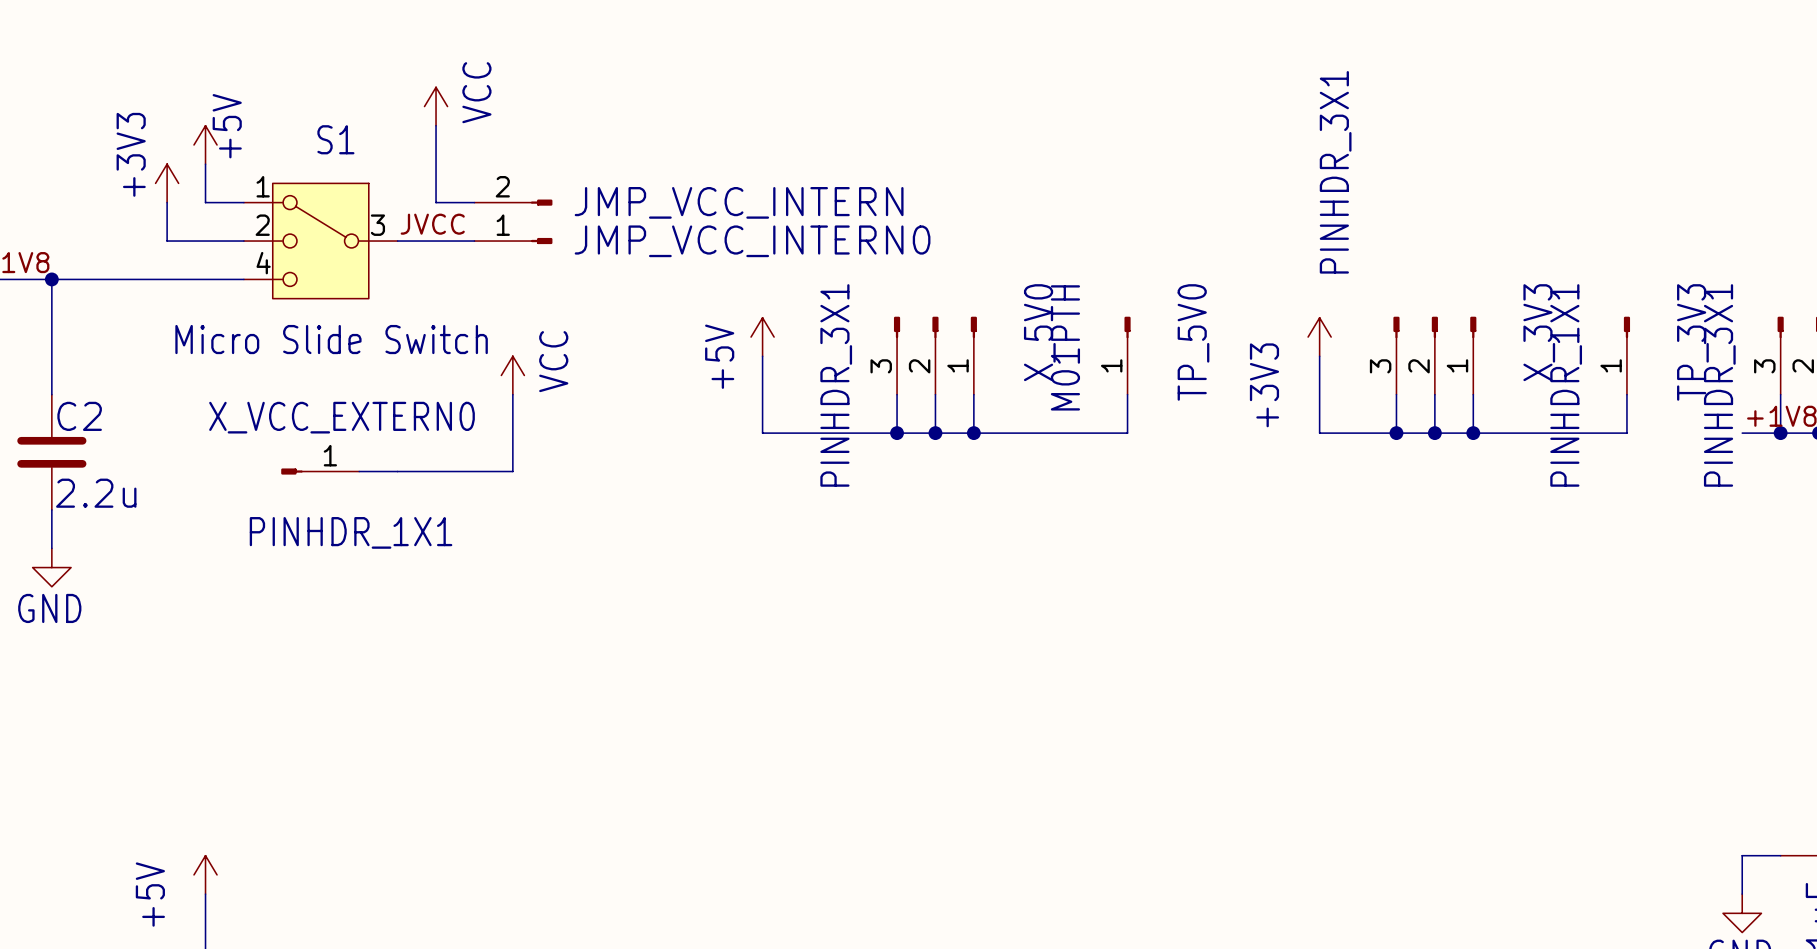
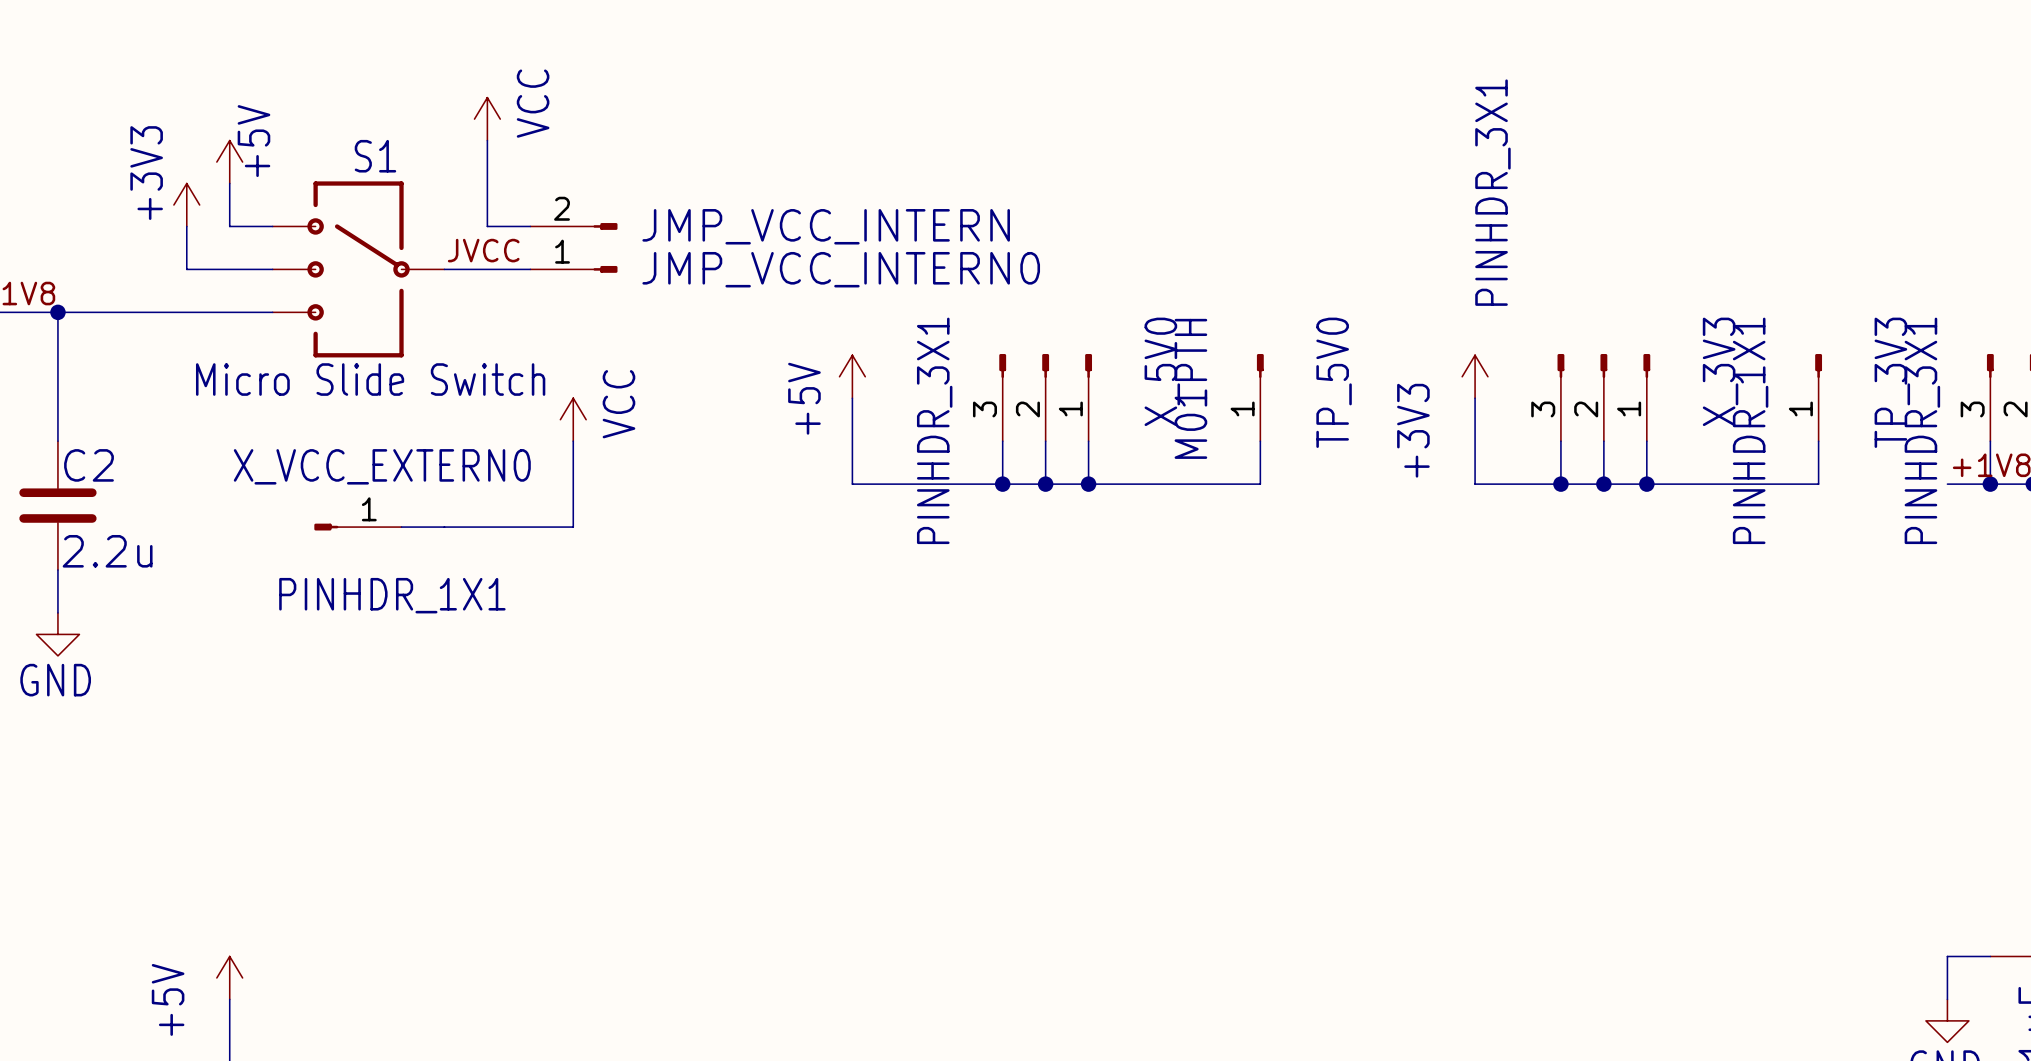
S1 symbol: [243, 183, 398, 299] -> [272, 181, 445, 358]

